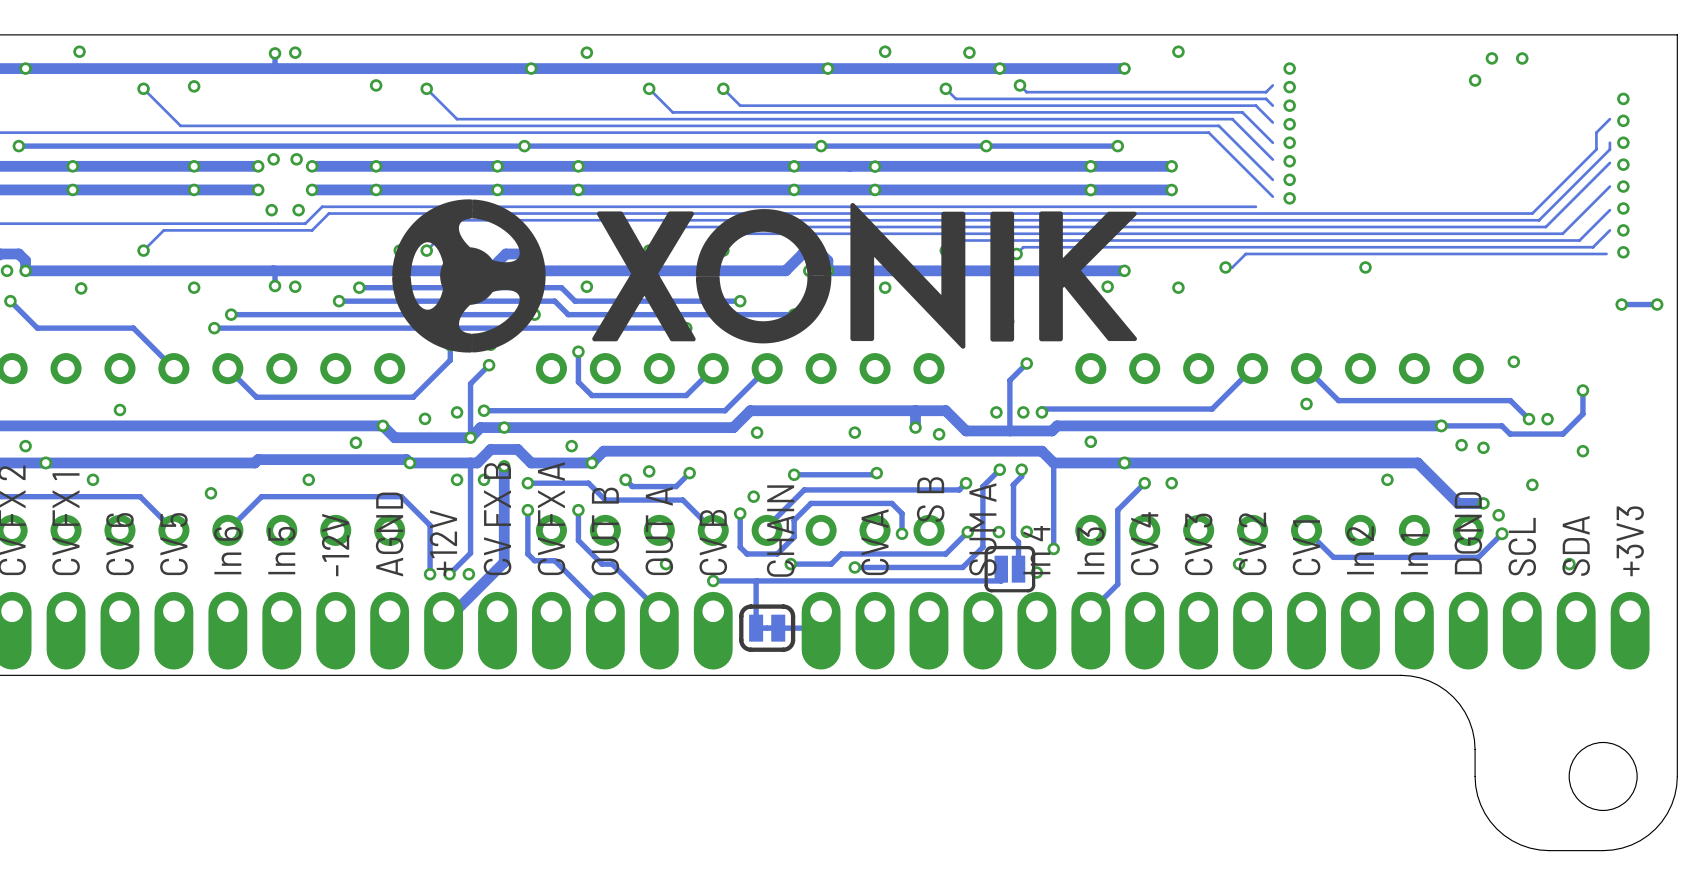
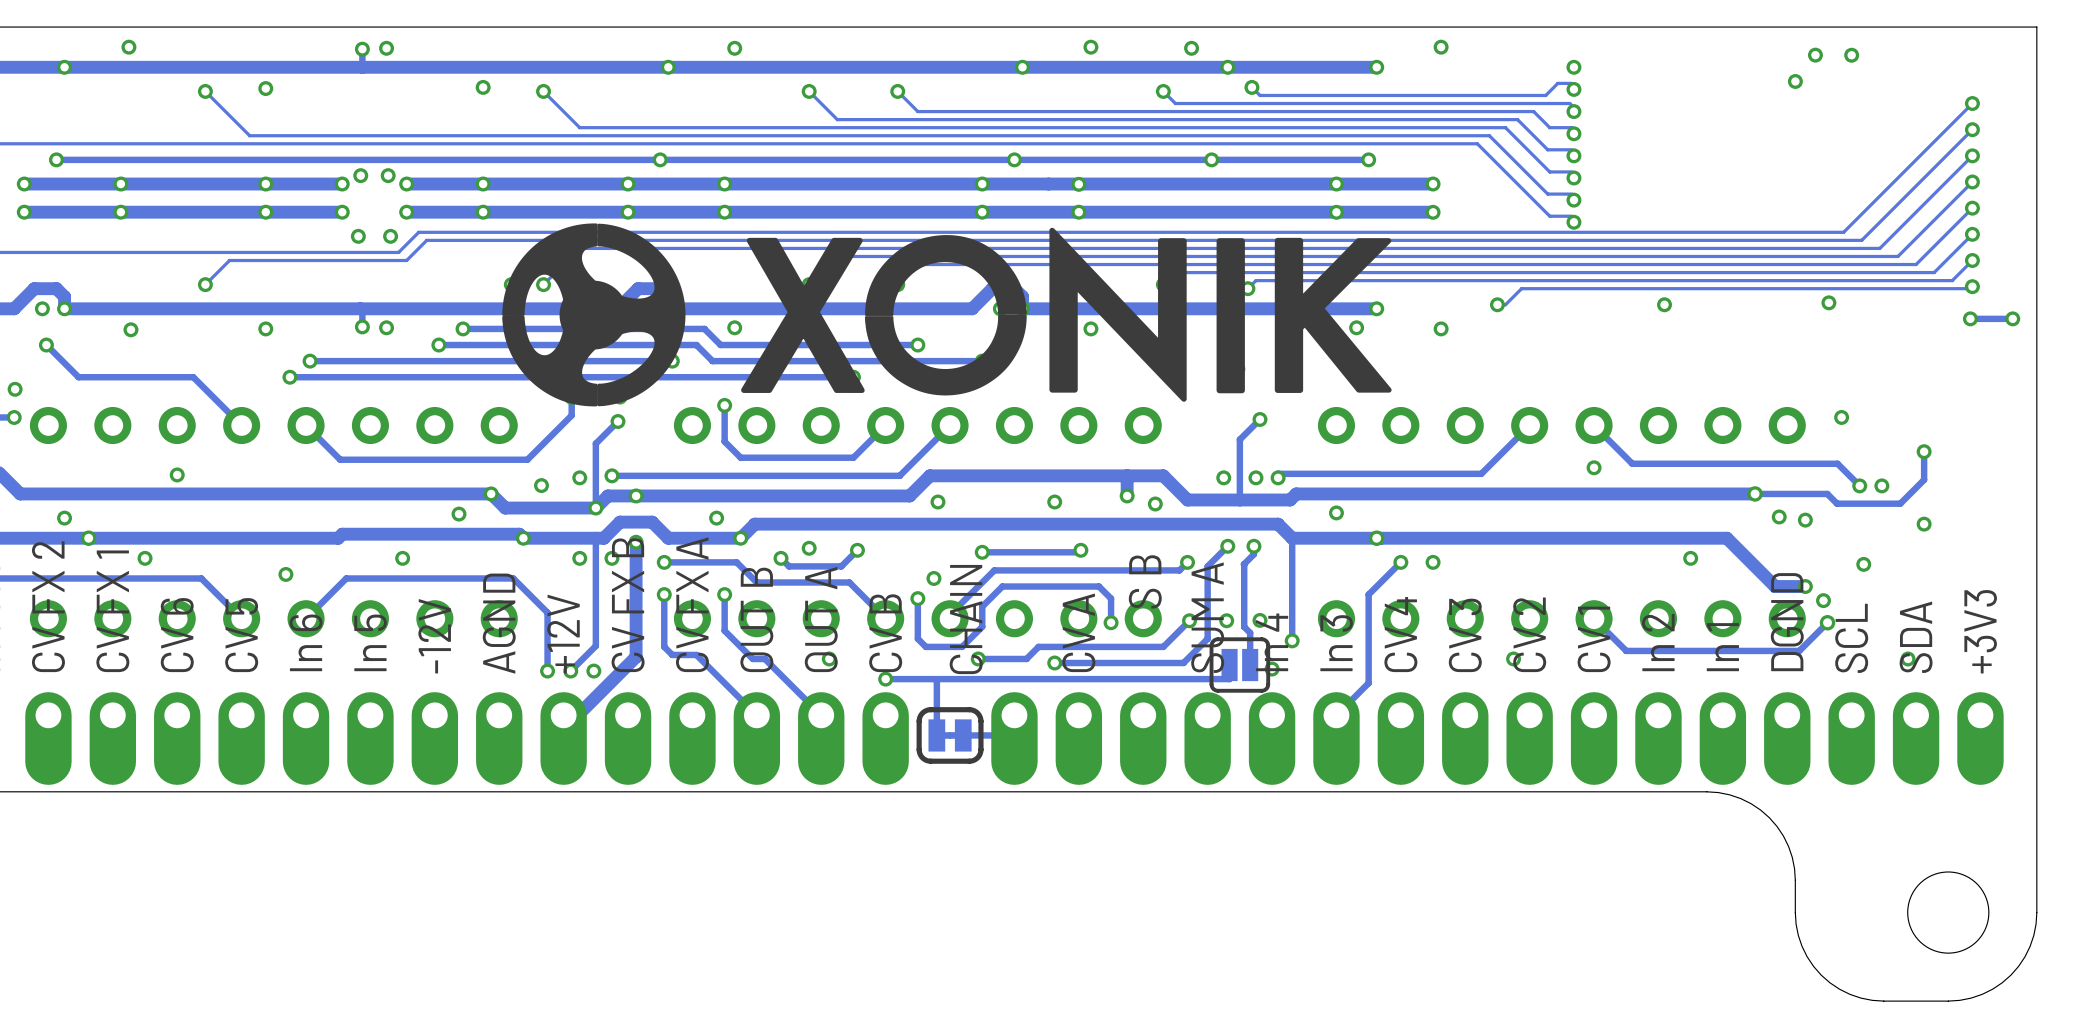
track: none -> (1571, 83) (1557, 83) (1553, 87)
track: (1266, 98) (1272, 105) -> (1545, 103) (1569, 103) (1571, 105)
track: none -> (1972, 103) (1843, 232) (1533, 232)
track: (1269, 119) (1272, 122) -> (1549, 127) (1571, 127)
track: (1609, 119) (1596, 132) (1596, 149) (1530, 213) -> (1972, 129) (1861, 240)
track: (1267, 137) (1272, 142) -> (1547, 149) (1571, 149)
track: (1609, 142) (1609, 149) (1539, 220) -> (1972, 155) (1879, 248) (1871, 248)
track: (1269, 156) (1272, 159) -> (1549, 171) (1571, 171)
track: (1609, 162) (1545, 227) -> (1972, 182) (1897, 256) (1879, 256)
track: (1267, 174) (1272, 179) -> (1547, 194) (1571, 194)
track: (1609, 186) (1562, 233) -> (1972, 208) (1916, 264) (1899, 264)
track: (1269, 193) (1272, 196) -> (1549, 216) (1571, 216)
track: (1609, 210) (1579, 240) -> (1972, 234) (1934, 272) (1920, 272)
track: (1609, 230) (1593, 247) -> (1972, 260) (1952, 280) (1936, 280)
track: none -> (1972, 286) (1970, 288) (1952, 288)
via: none -> (1828, 302)
via: none -> (1970, 318)
via: none -> (2012, 318)
via: (1621, 304) -> none
track: (1657, 304) (1621, 304) -> (2012, 318) (1970, 318)
via: (1657, 304) -> none

